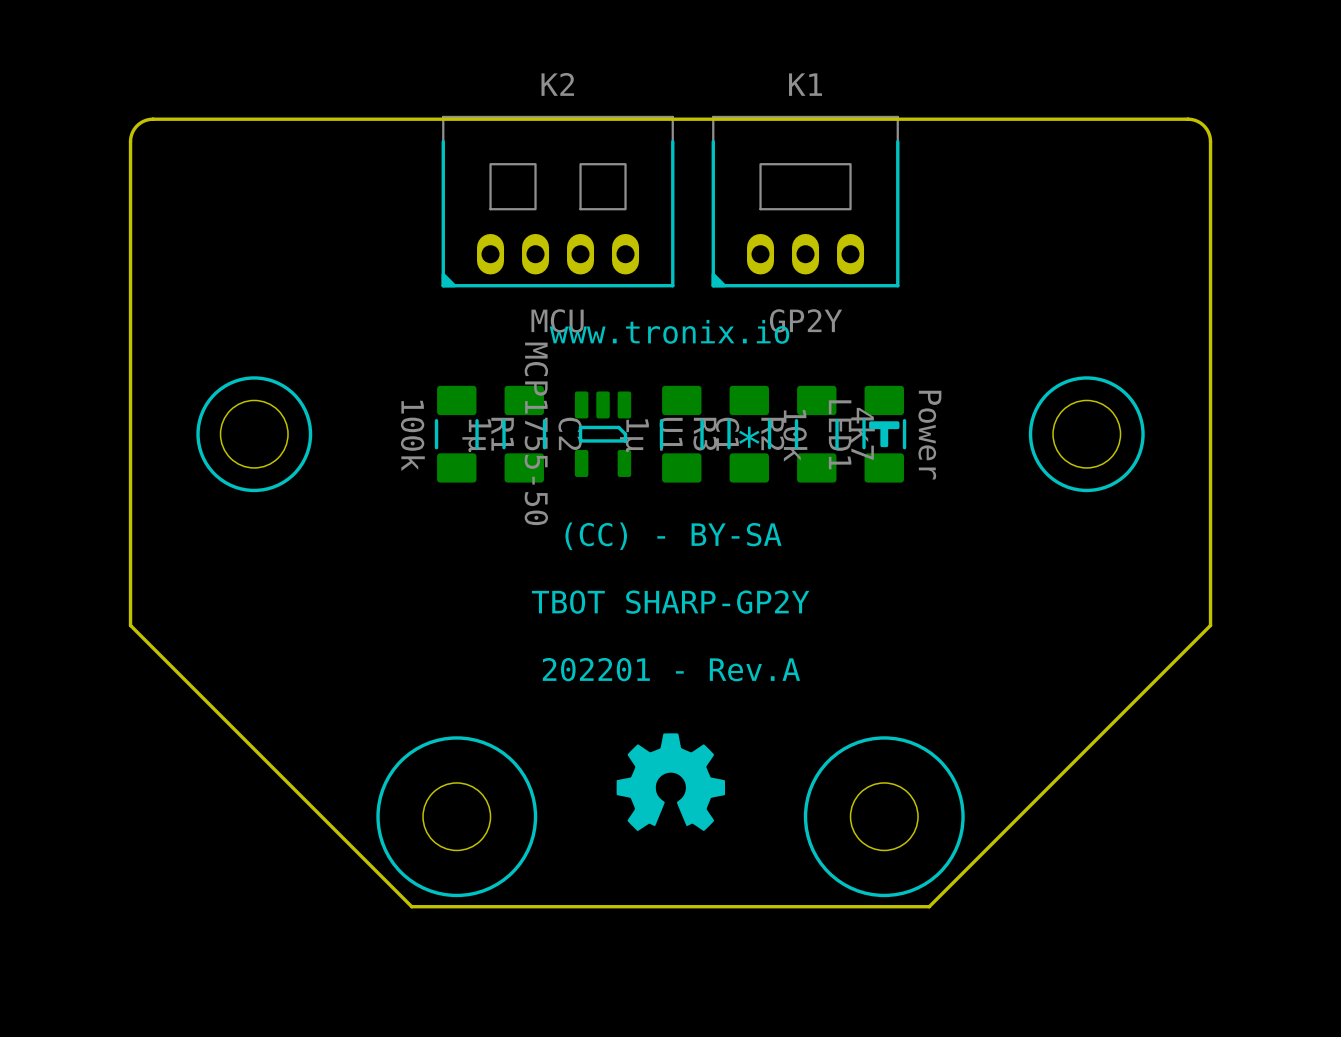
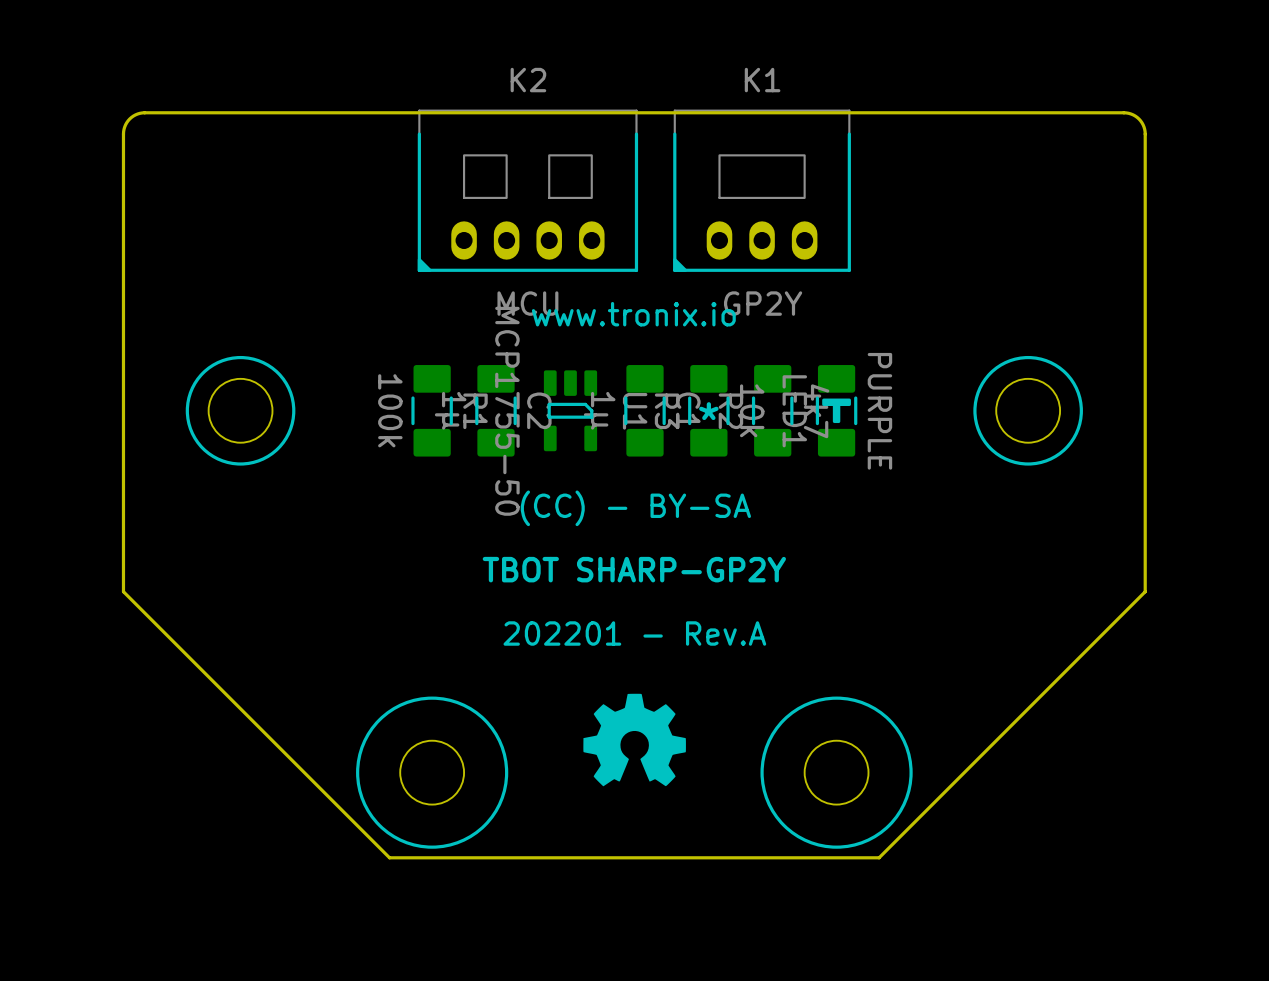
LED1 value: Power (929, 435) -> PURPLE (879, 411)

